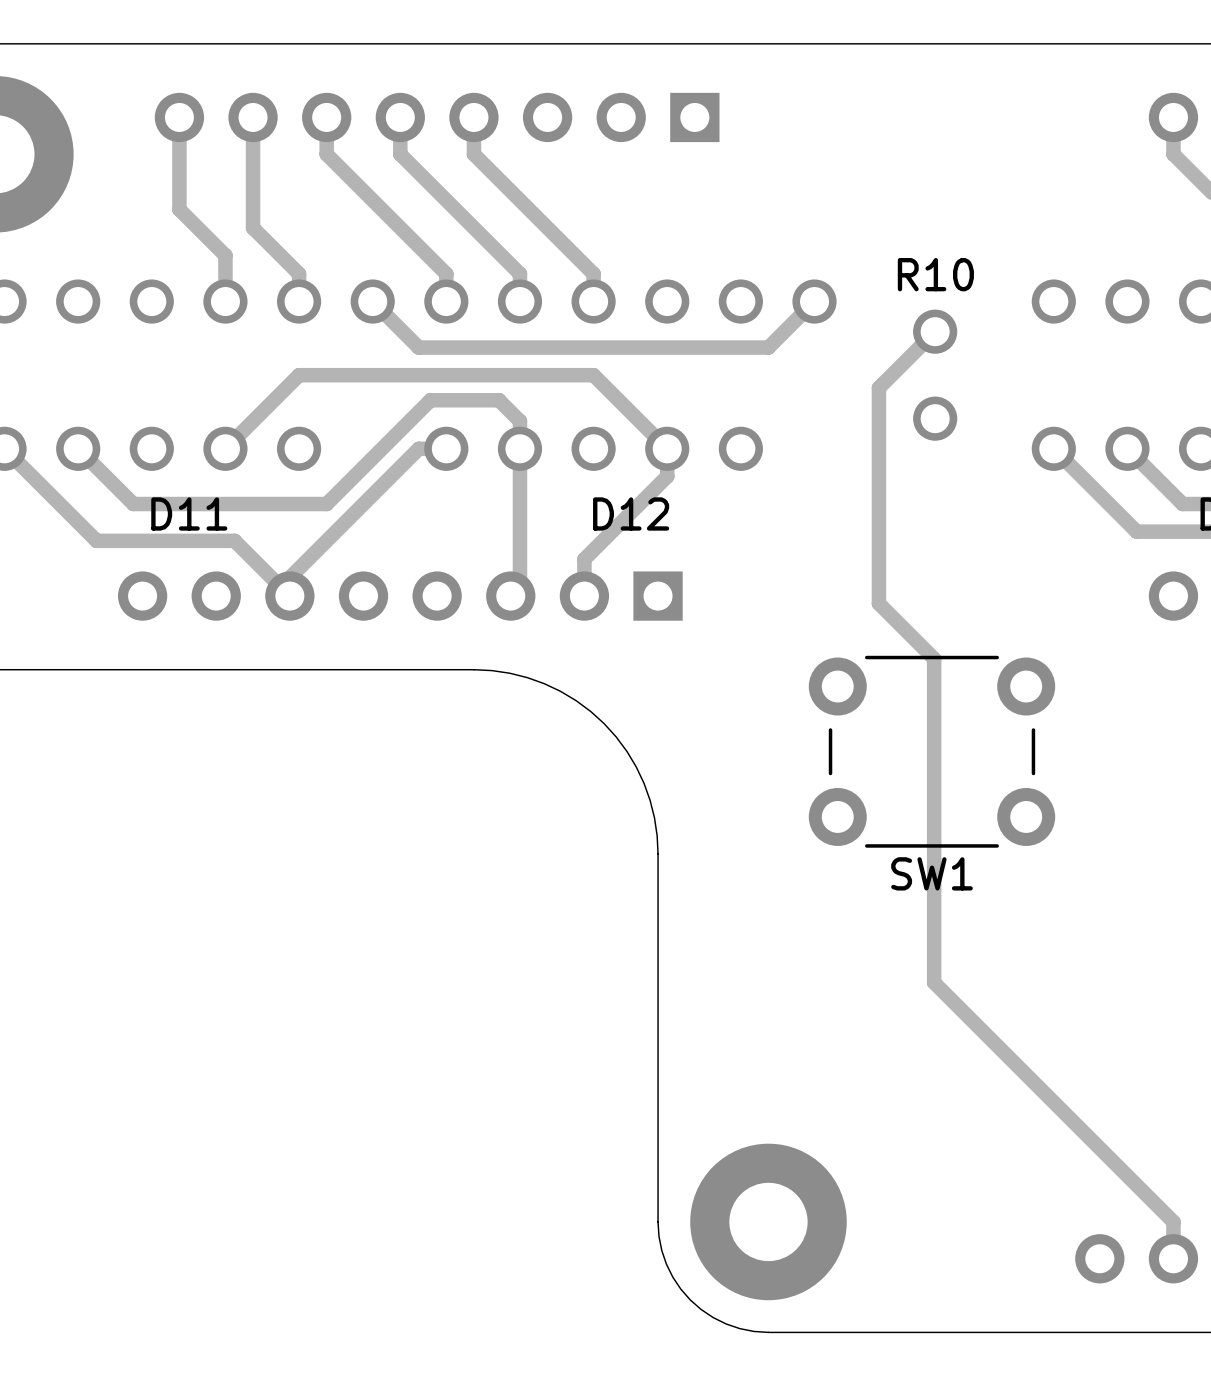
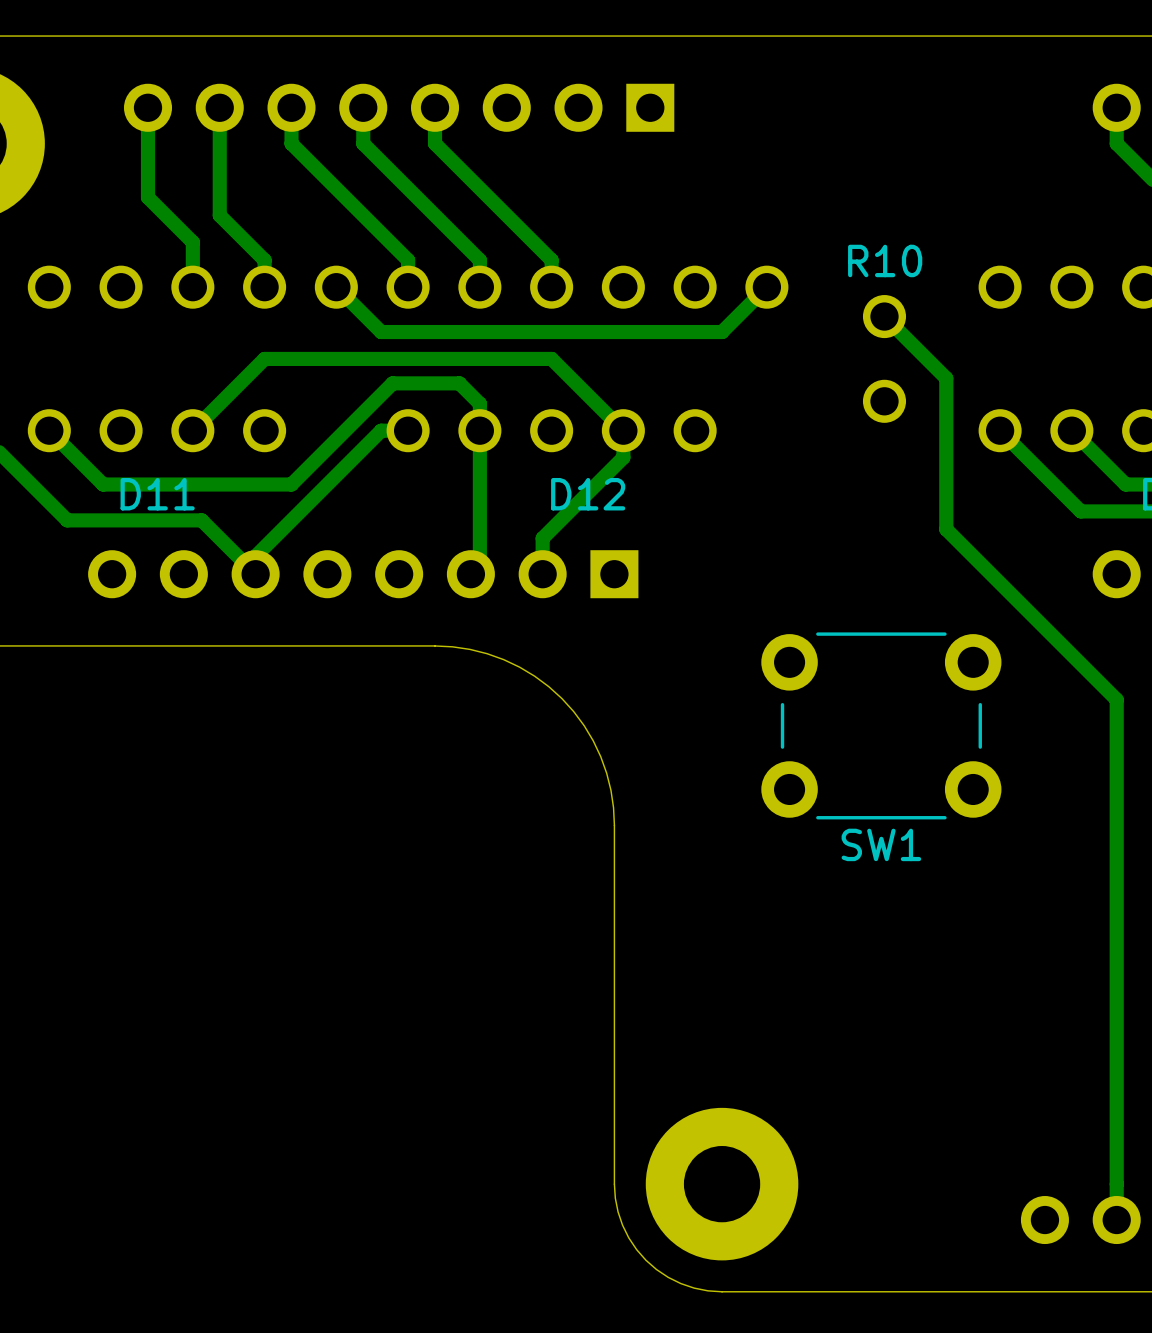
track: (935, 331) (878, 387) (878, 603) (934, 658) (934, 982) (1173, 1221) -> (884, 316) (946, 378) (946, 529) (1116, 699) (1116, 1184)

